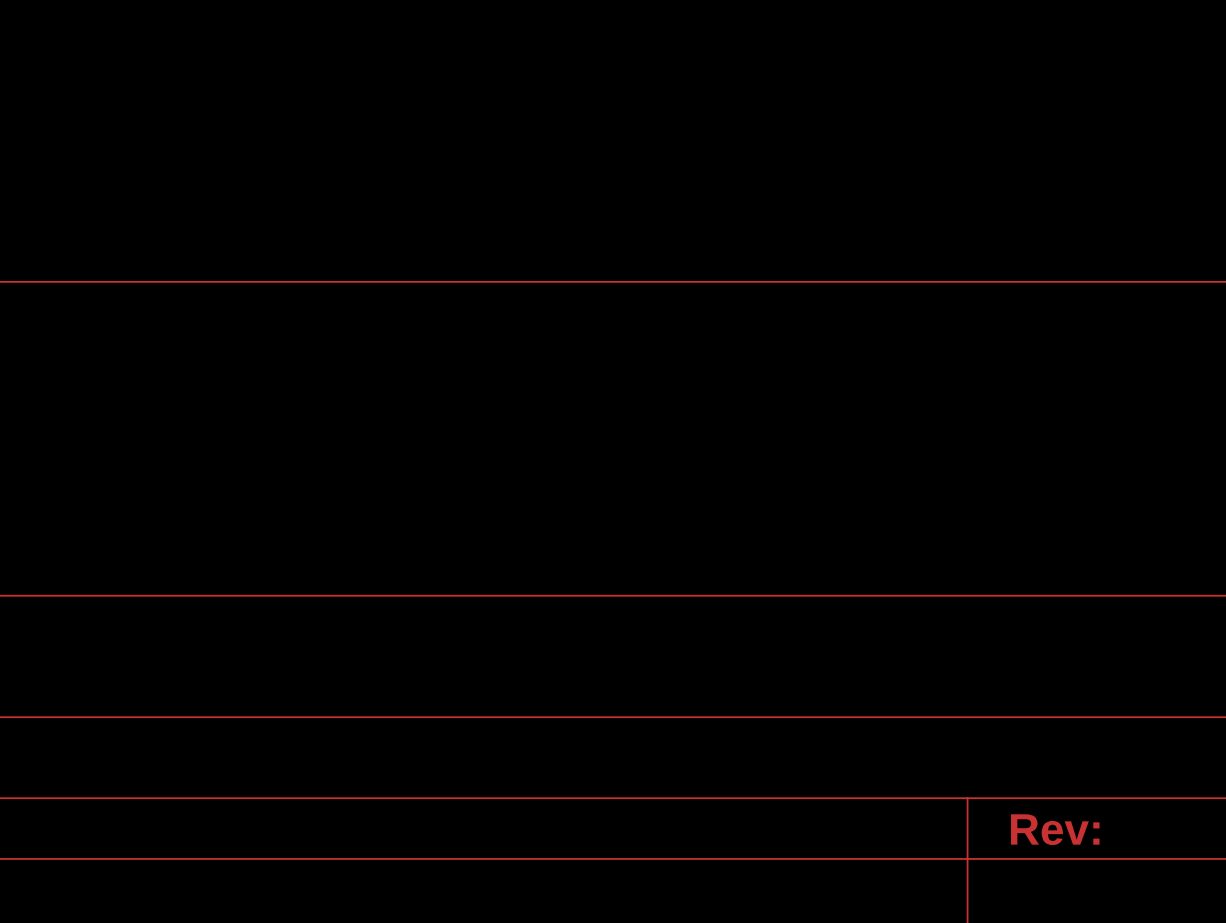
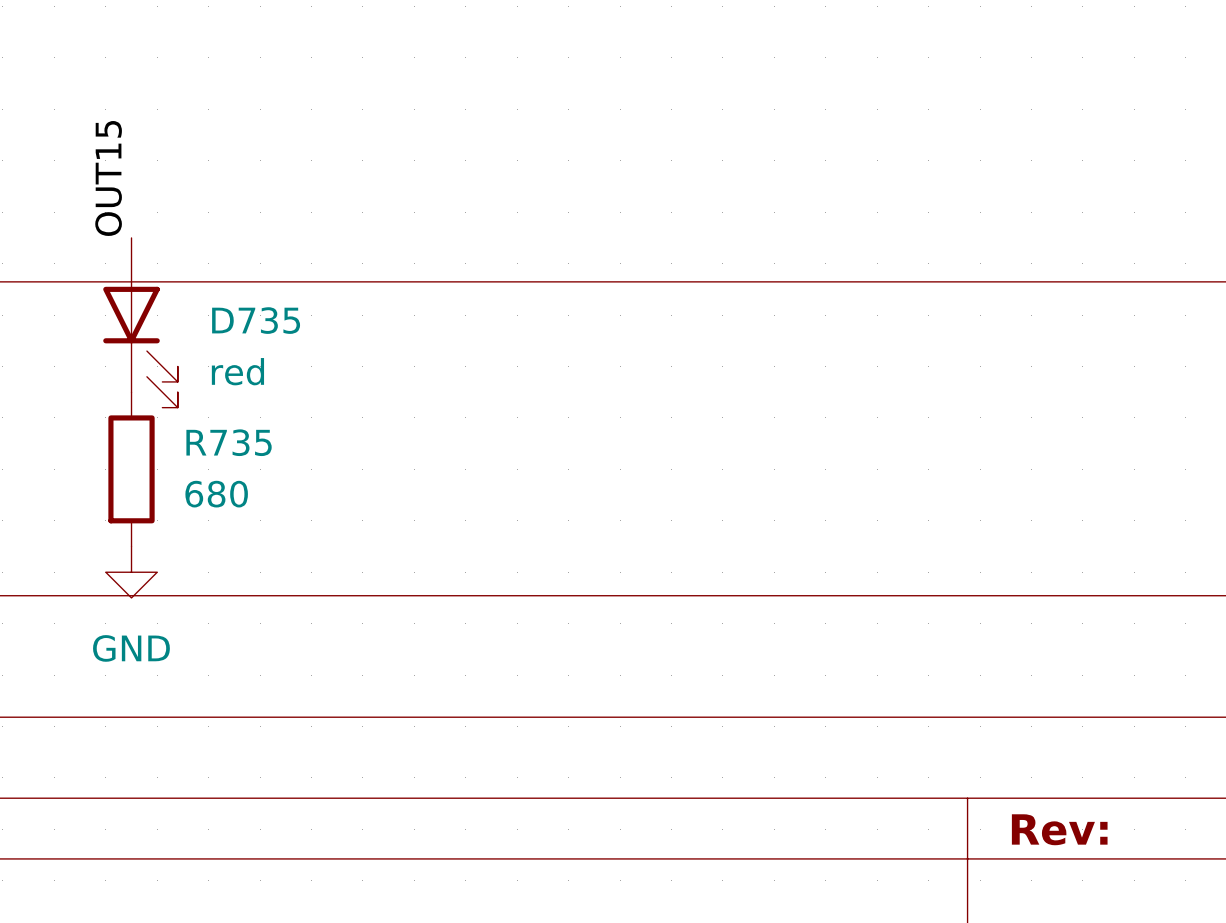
label: none -> OUT15 (108, 178)
D735: none -> red (140, 322)
R735: none -> 680 (131, 469)
power symbol: none -> GND (131, 572)

